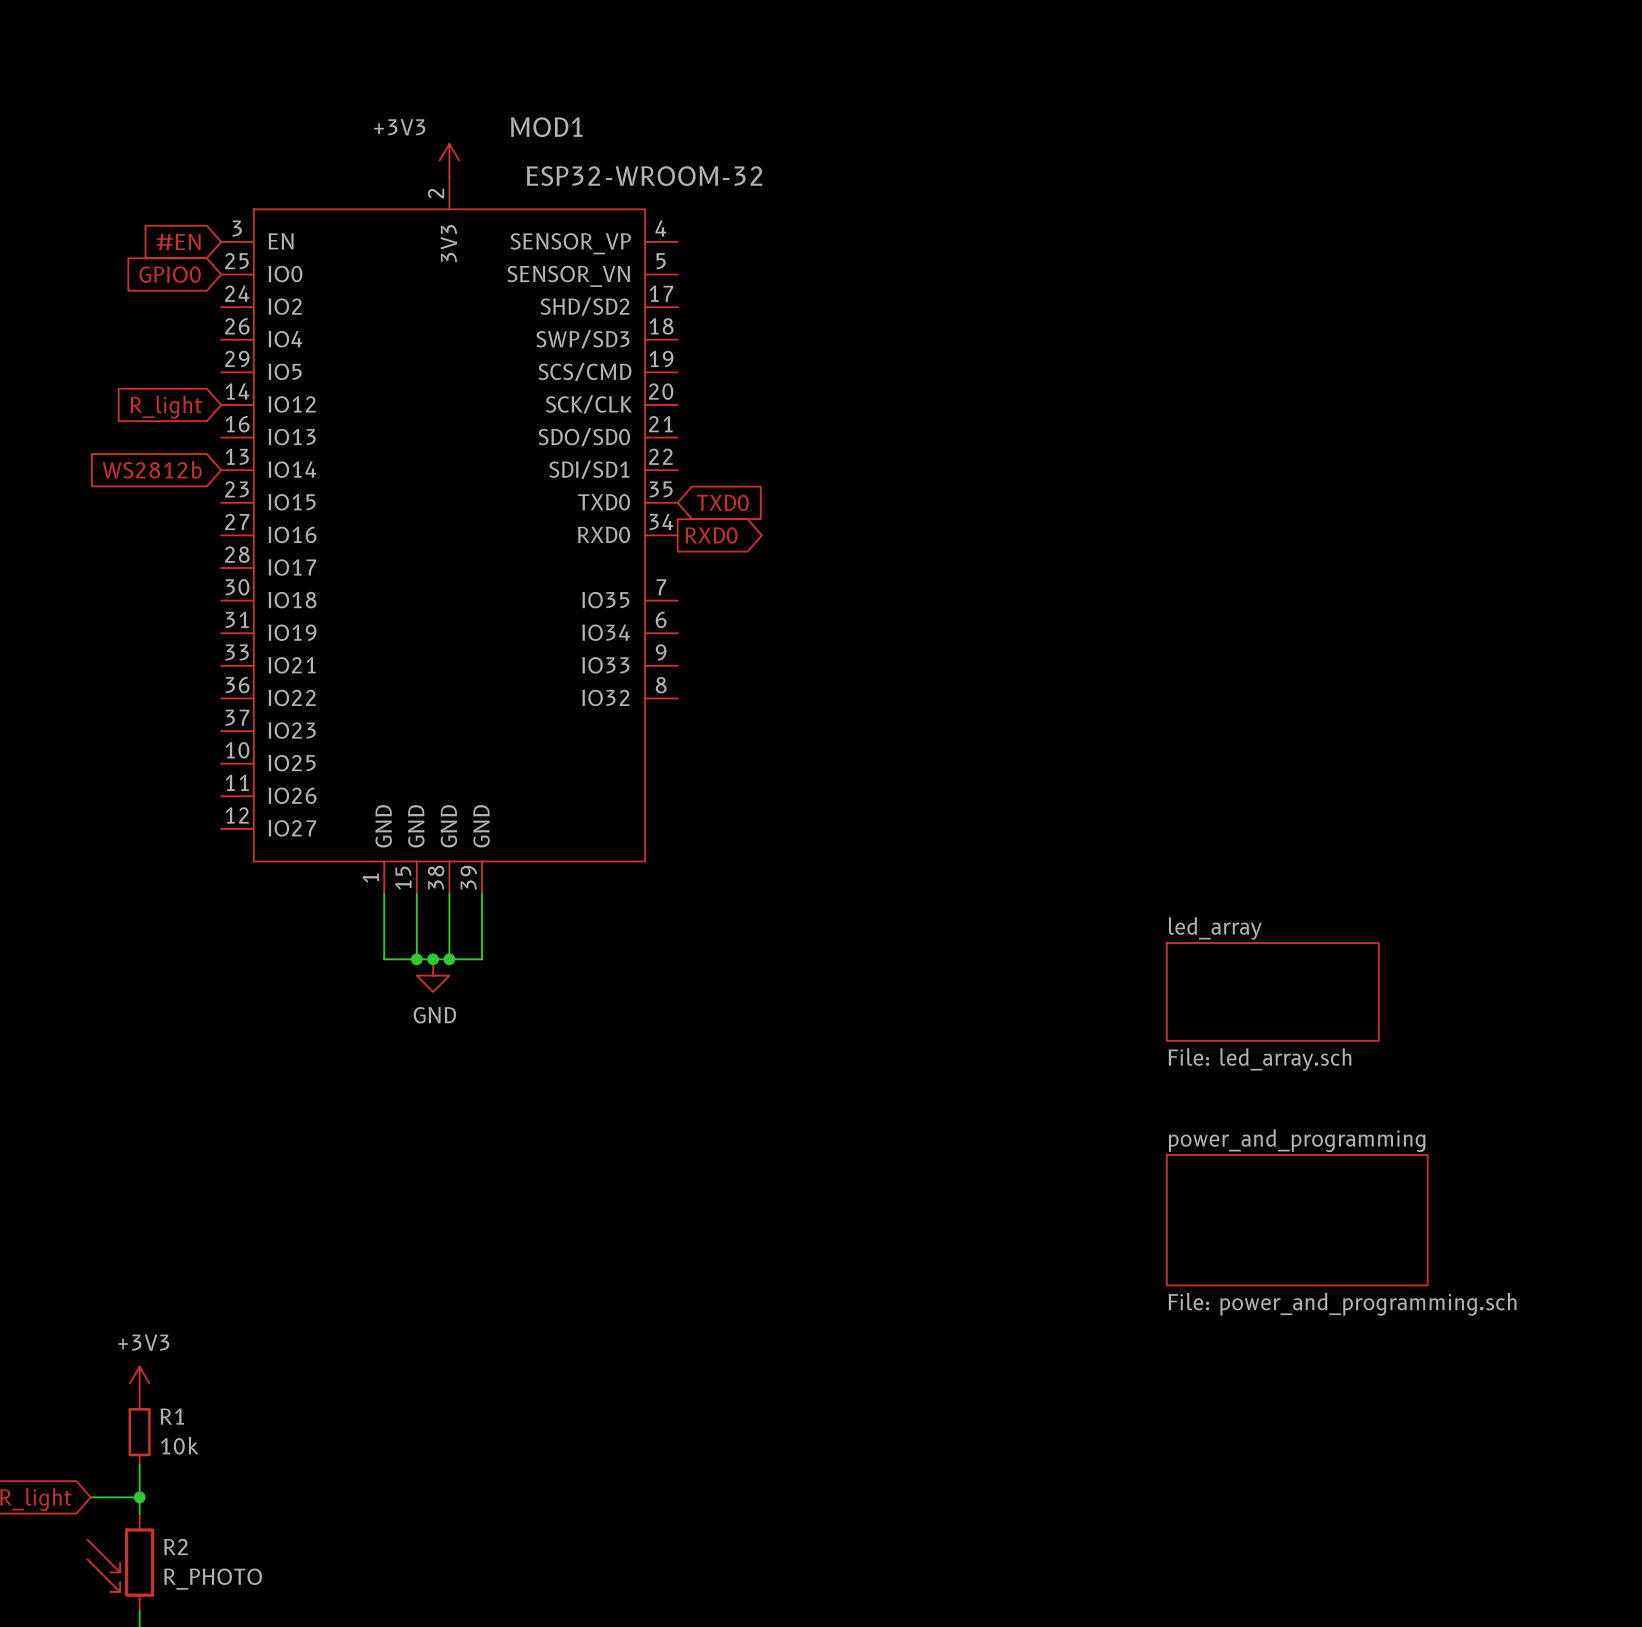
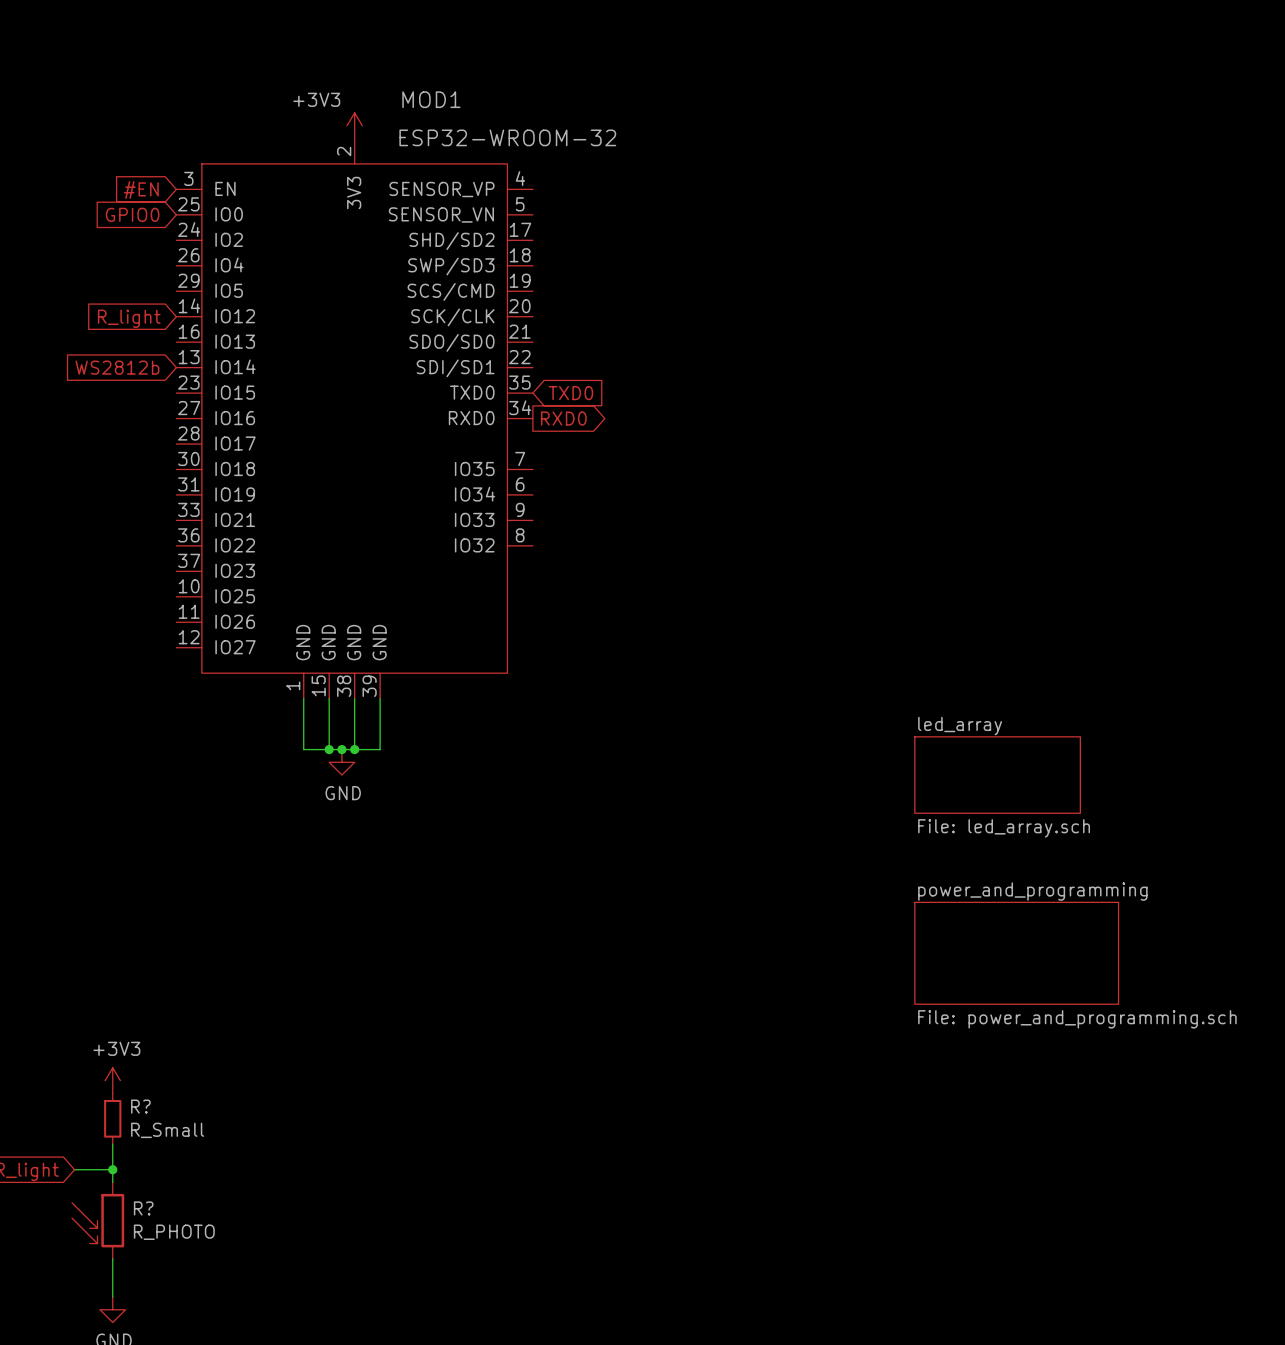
R1 name: R1 (172, 1416) -> R? (140, 1106)
R1 value: 10k (179, 1445) -> R_Small (167, 1130)
R2 name: R2 (175, 1547) -> R? (143, 1208)

